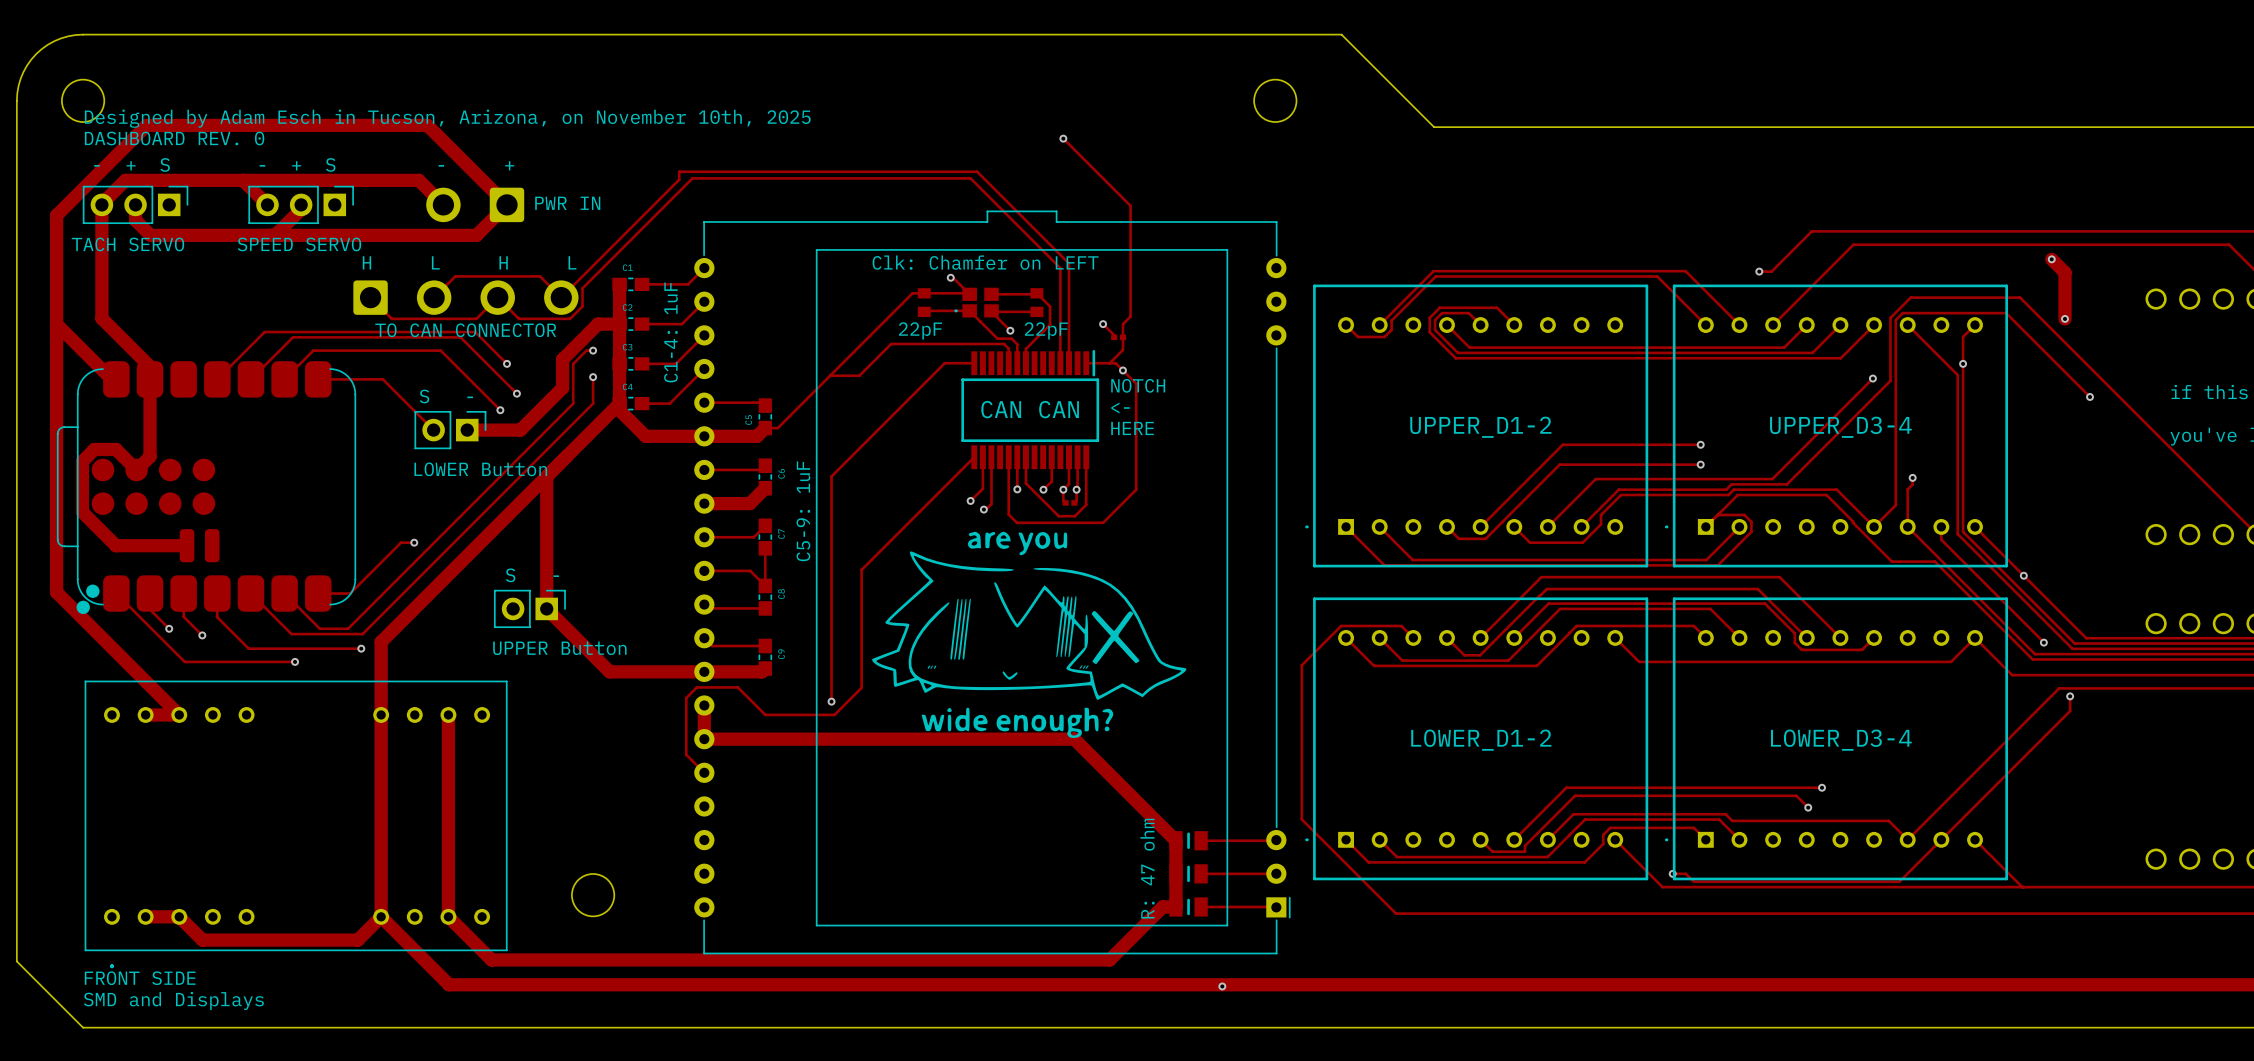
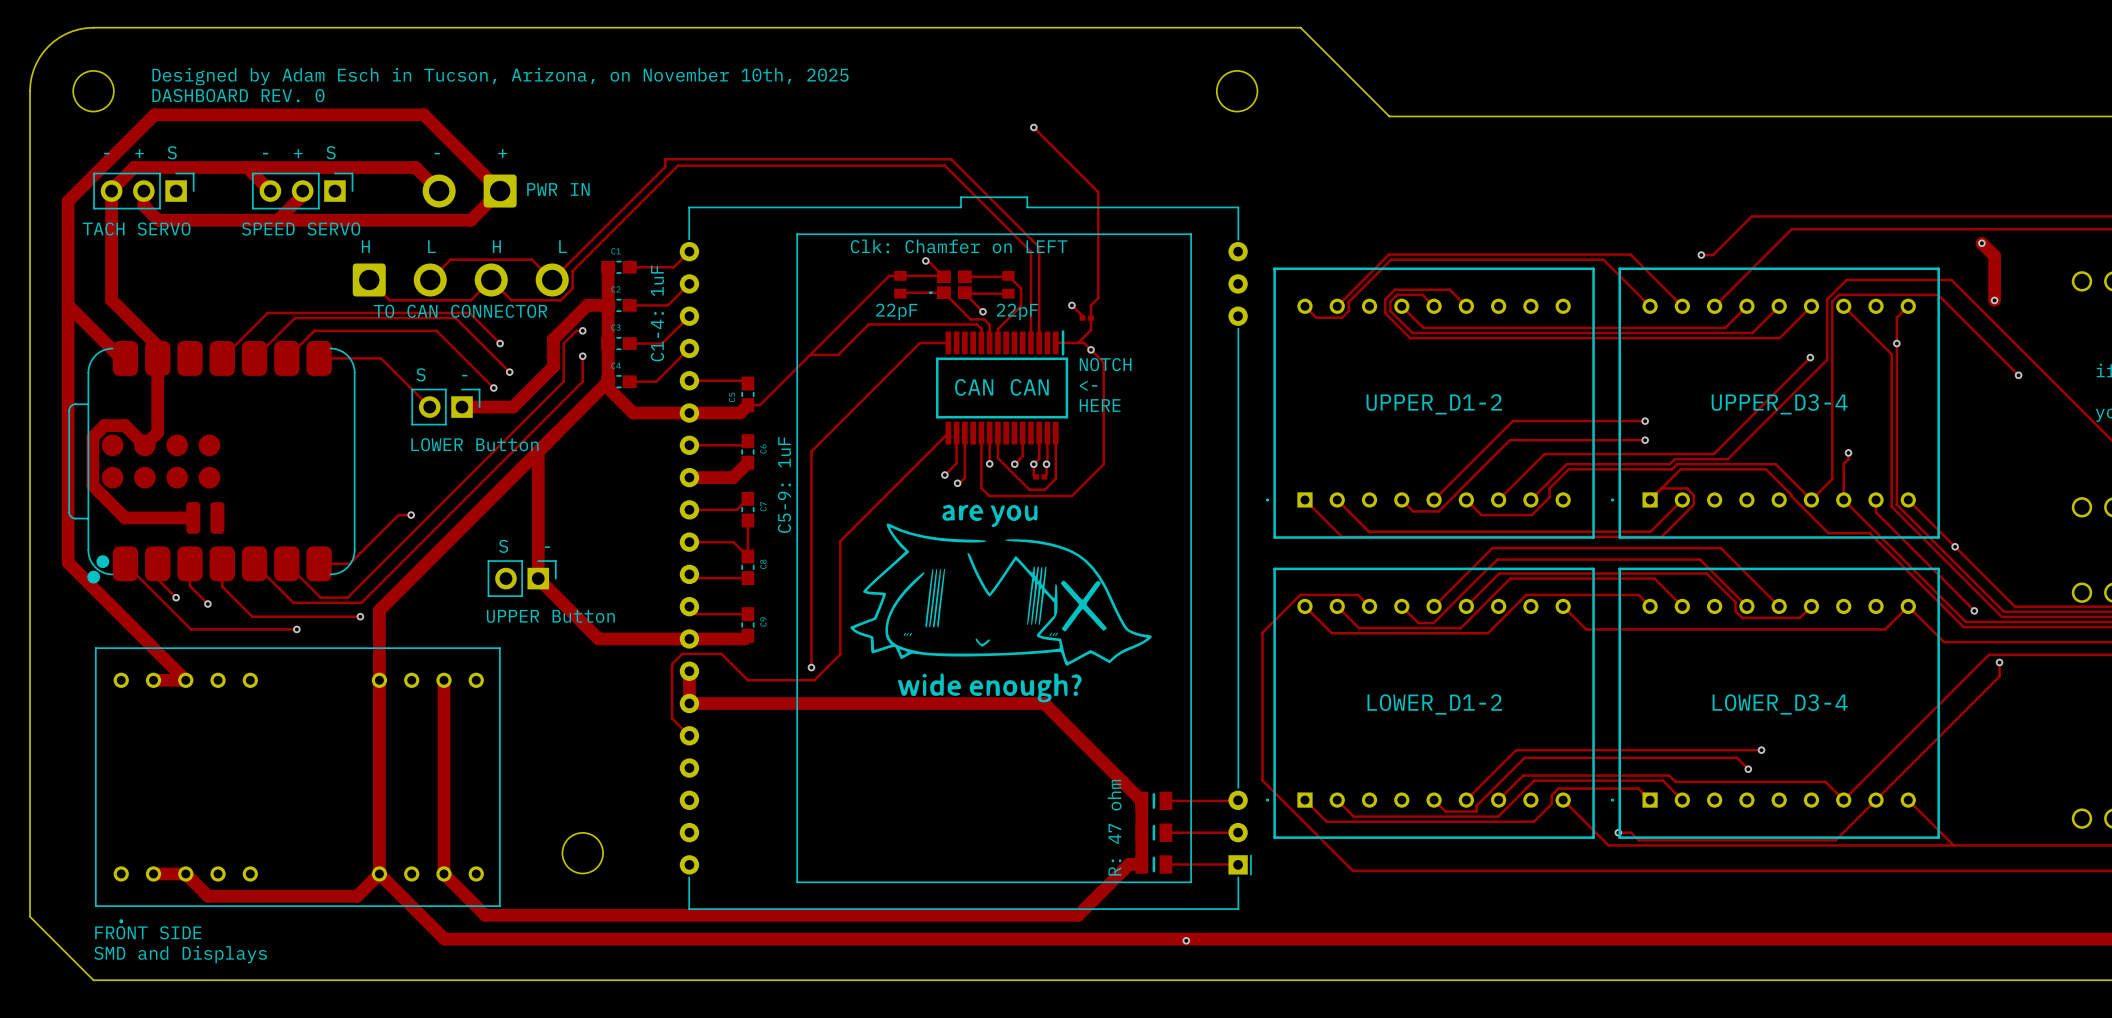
text position: Designed by Adam Esch in Tucson, Arizona, on November 10th, 2025 (447, 118) -> Designed by Adam Esch in Tucson, Arizona, on November 10th, 2025 (500, 76)
text position: DASHBOARD REV. 0 (174, 138) -> DASHBOARD REV. 0 (238, 95)

